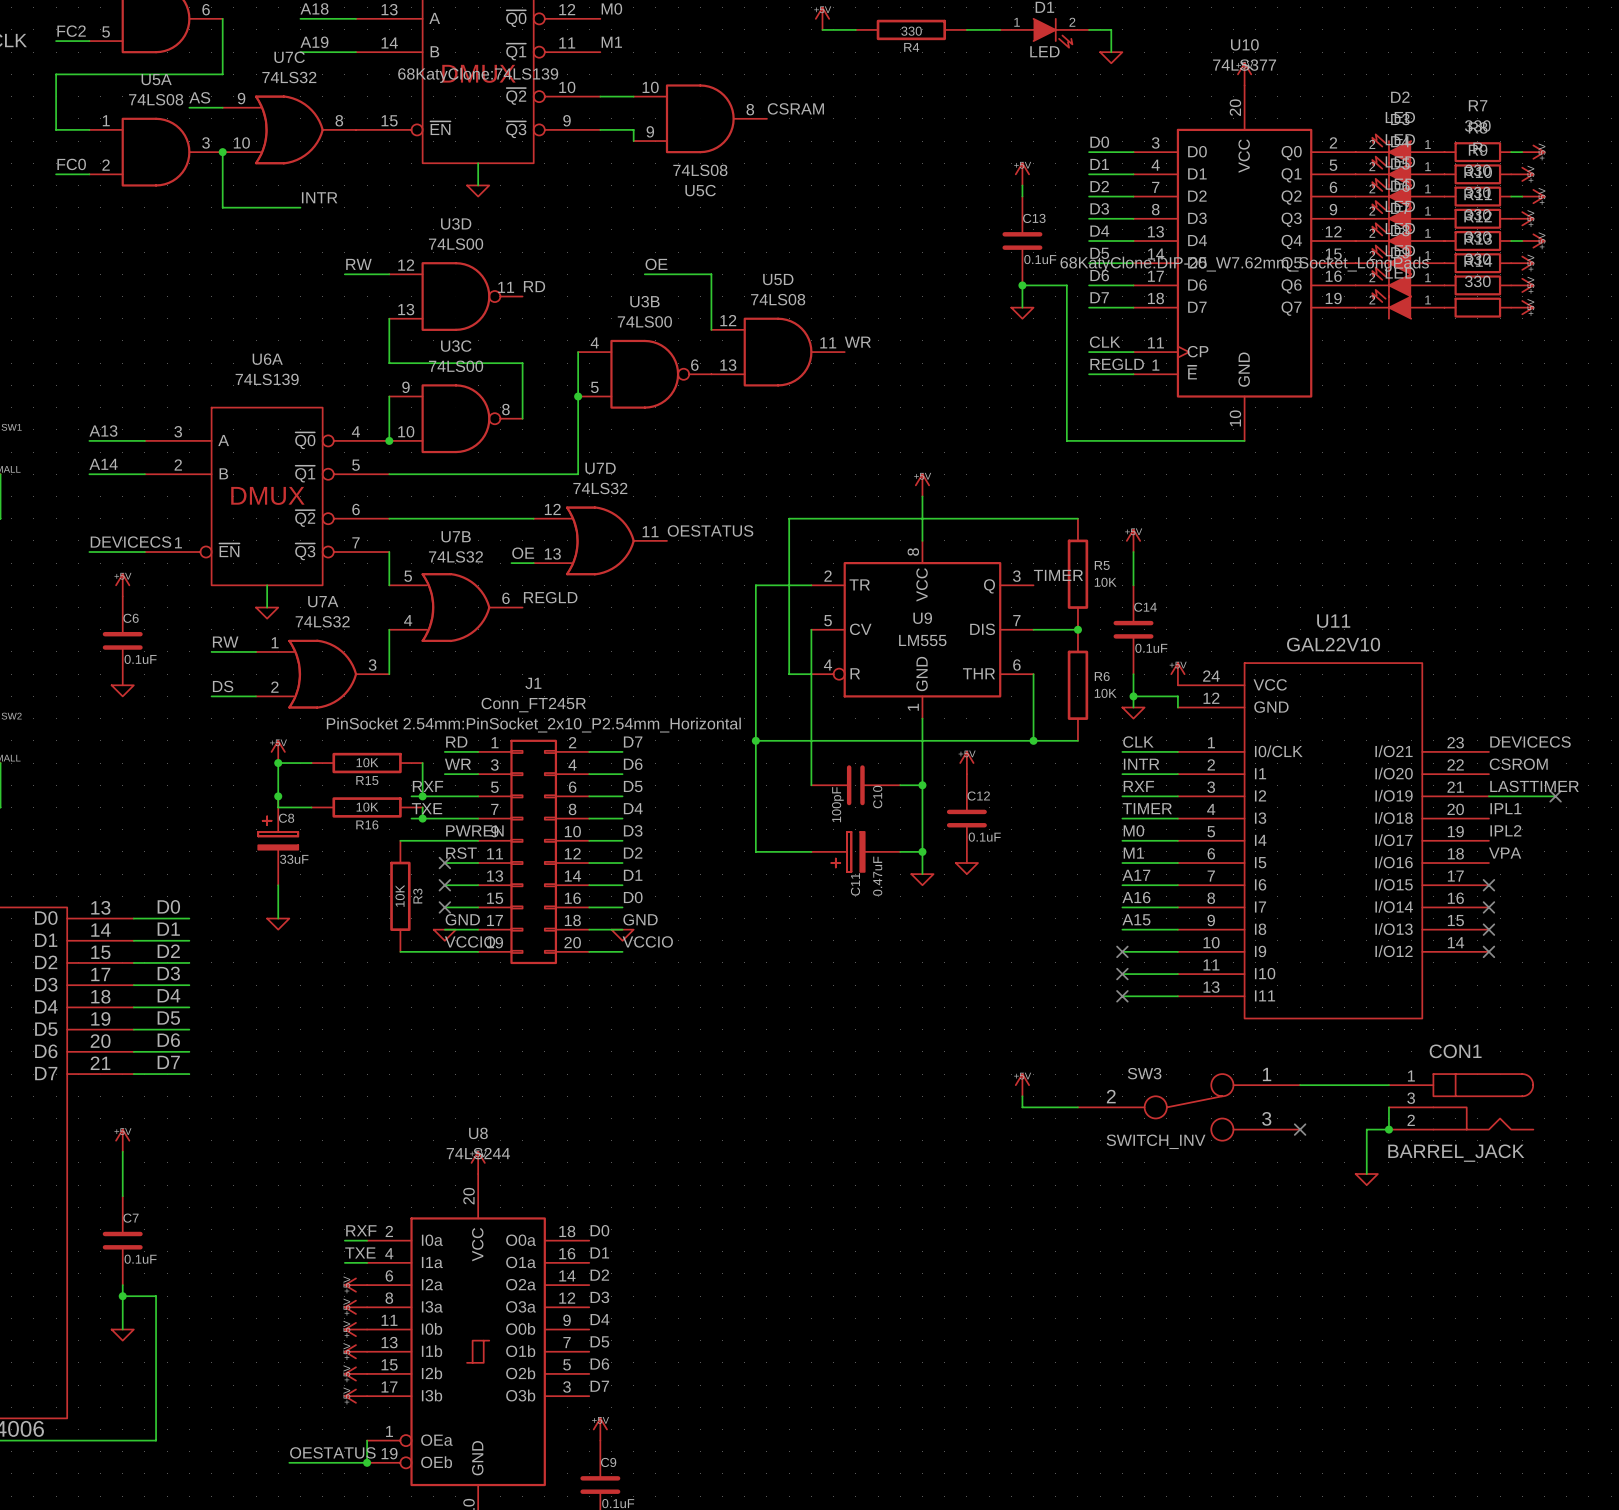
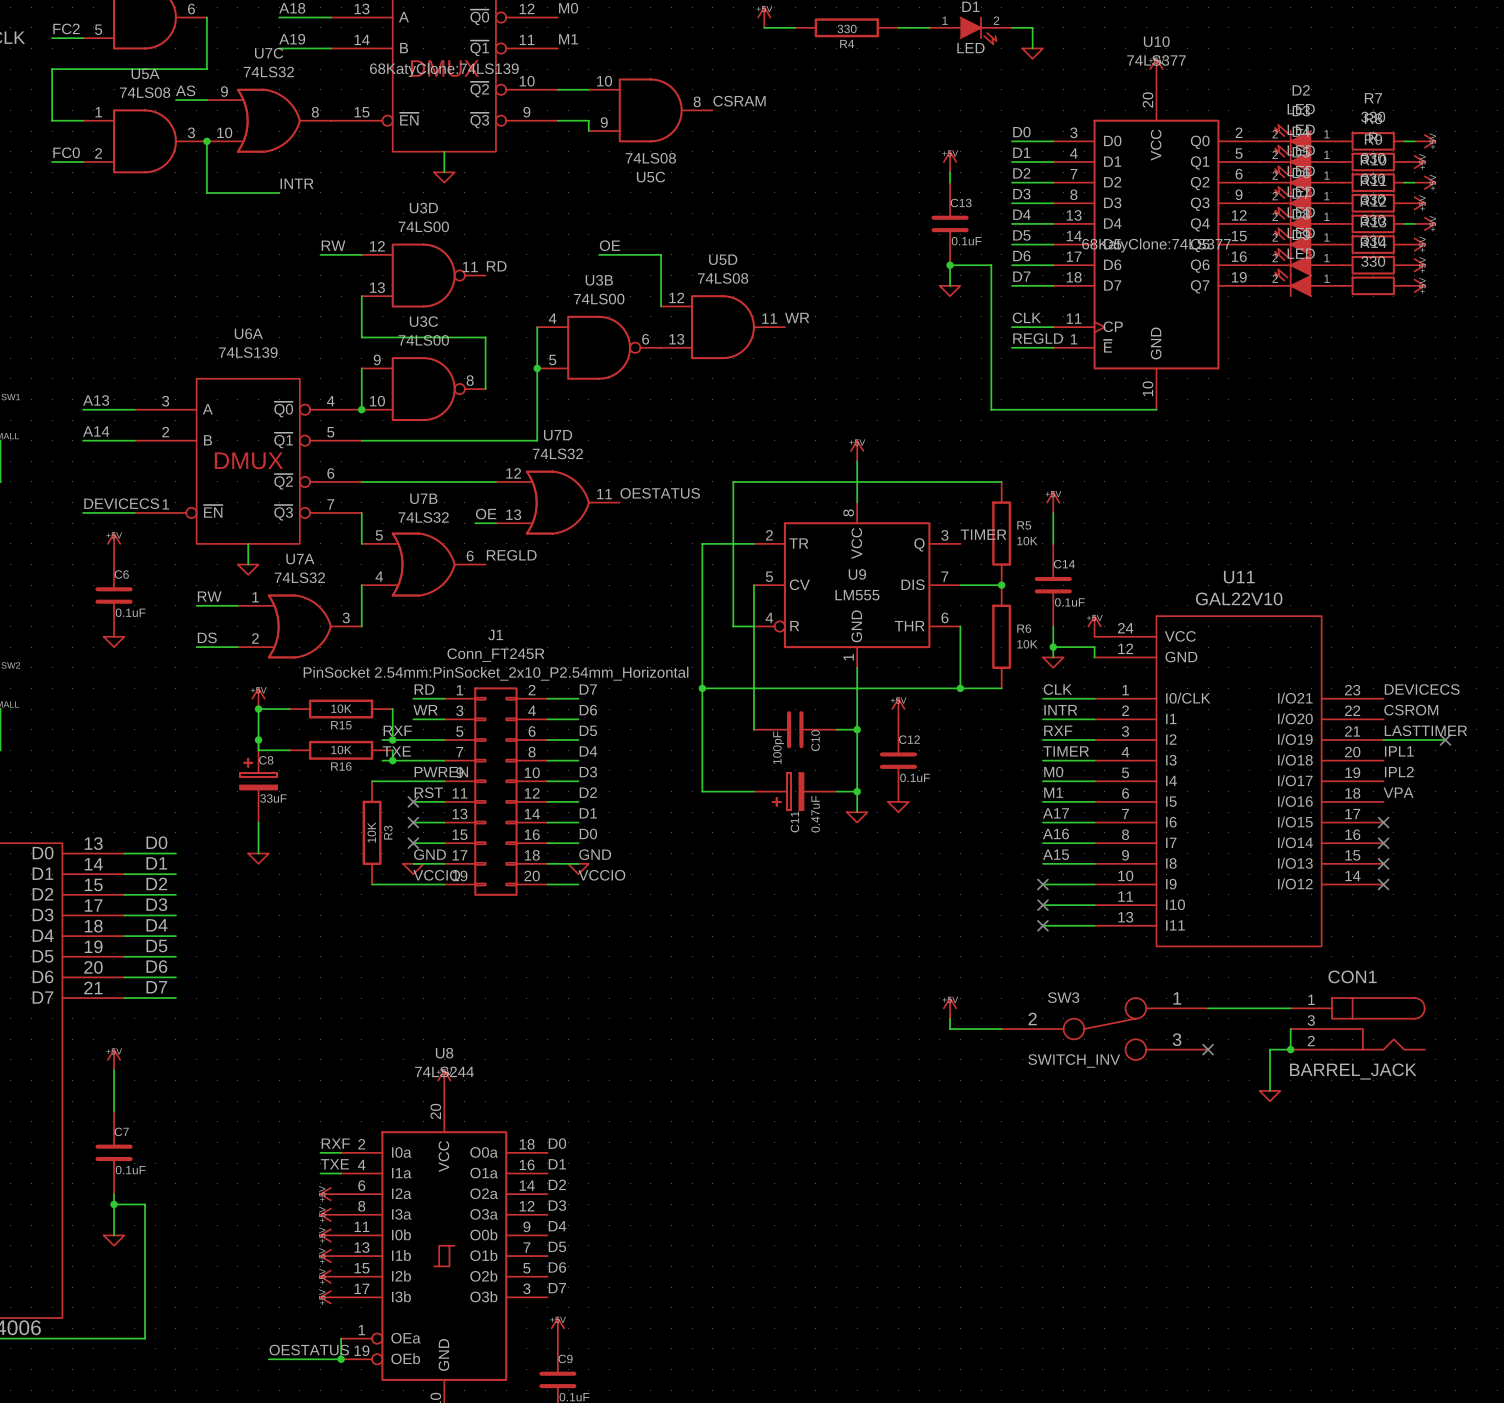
U10 text: 68KatyClone:DIP-20_W7.62mm_Socket_LongPads (1244, 264) -> 68KatyClone:74LS377 (1156, 245)

